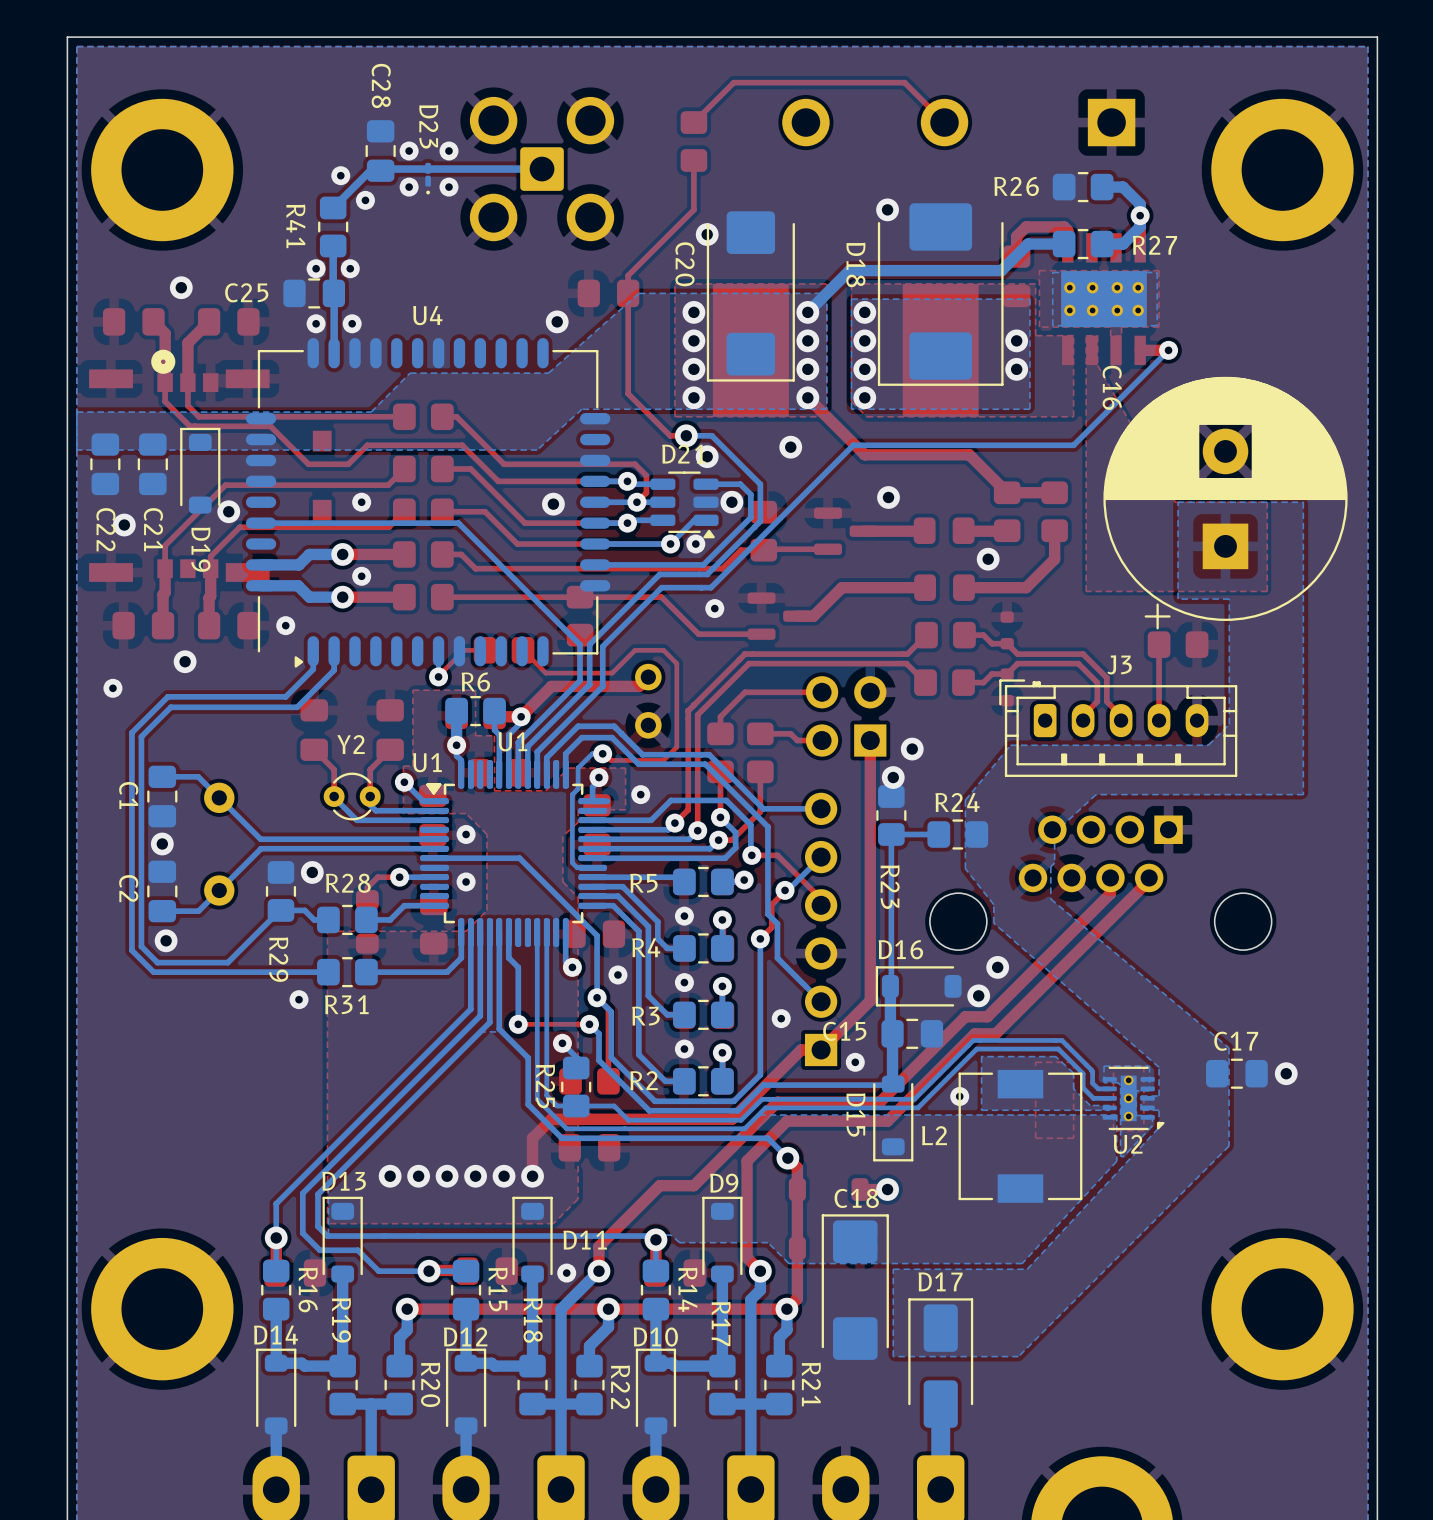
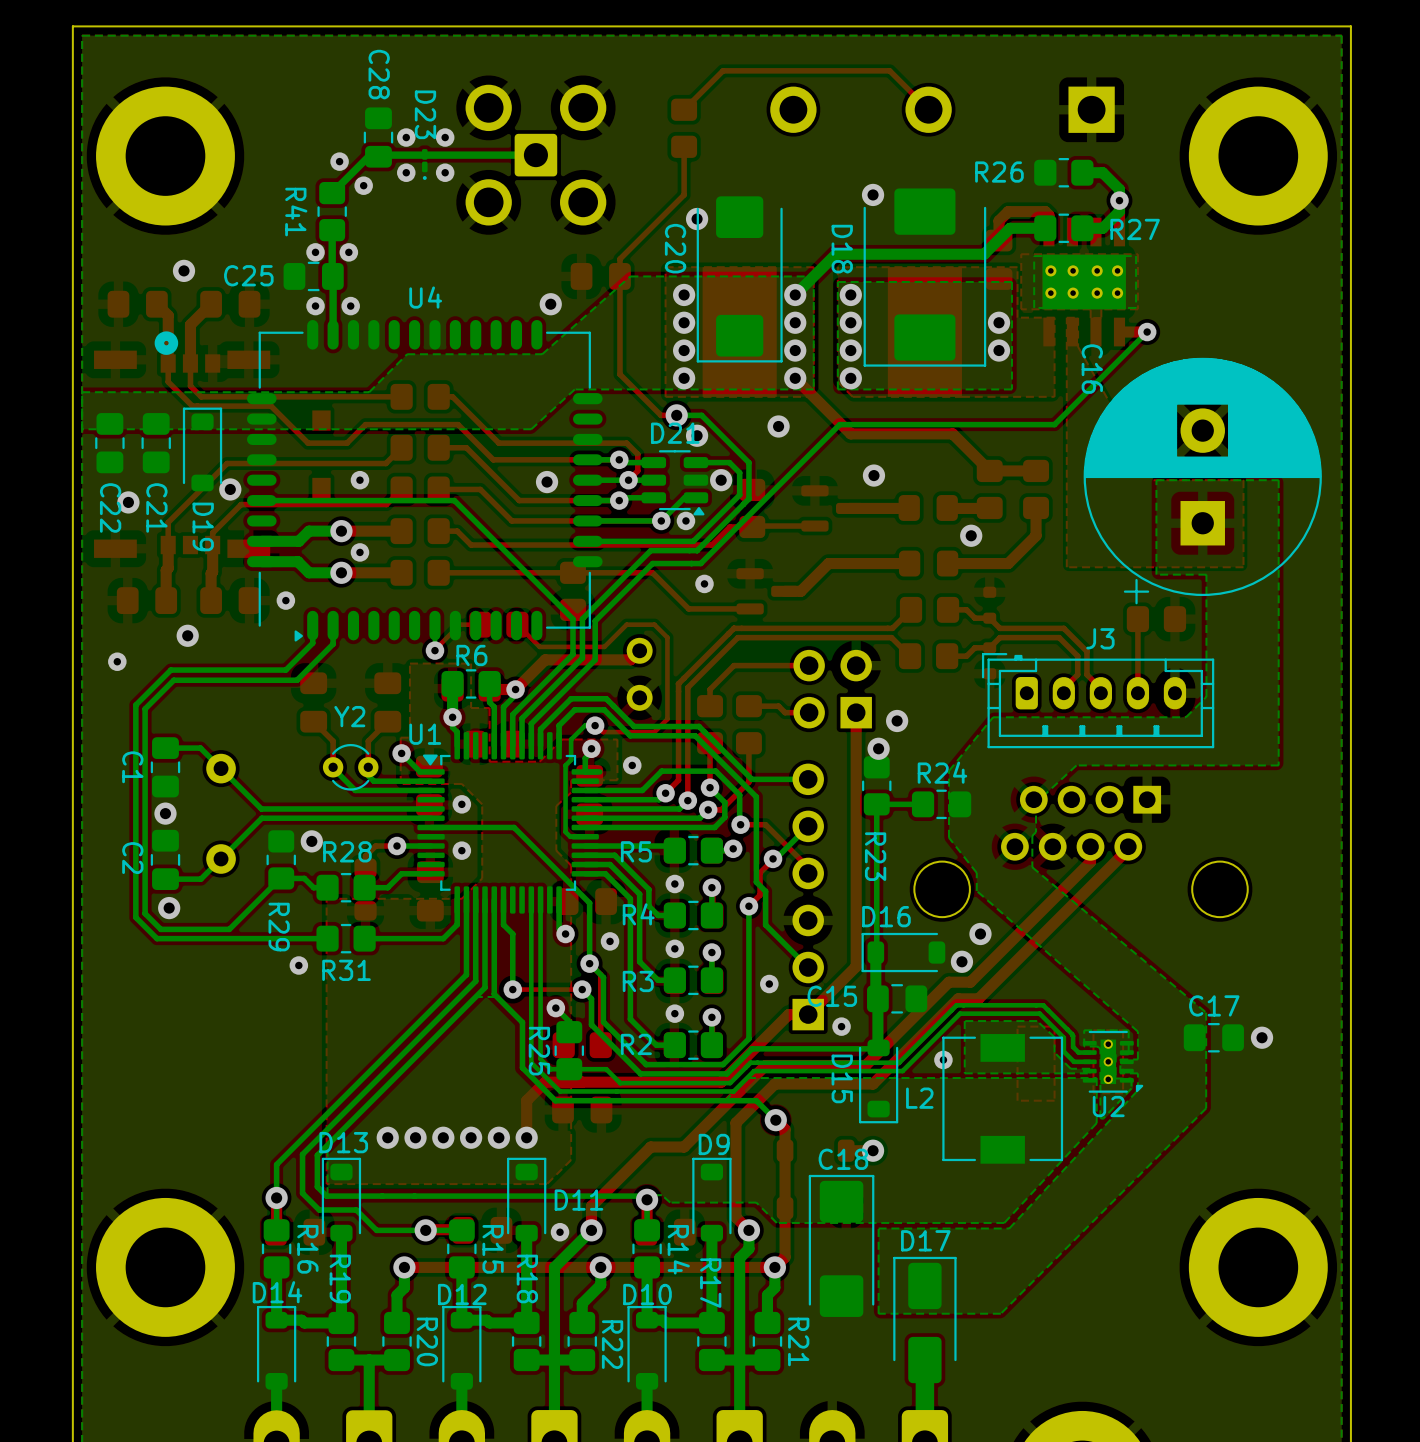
U1: (513, 853) -> none

